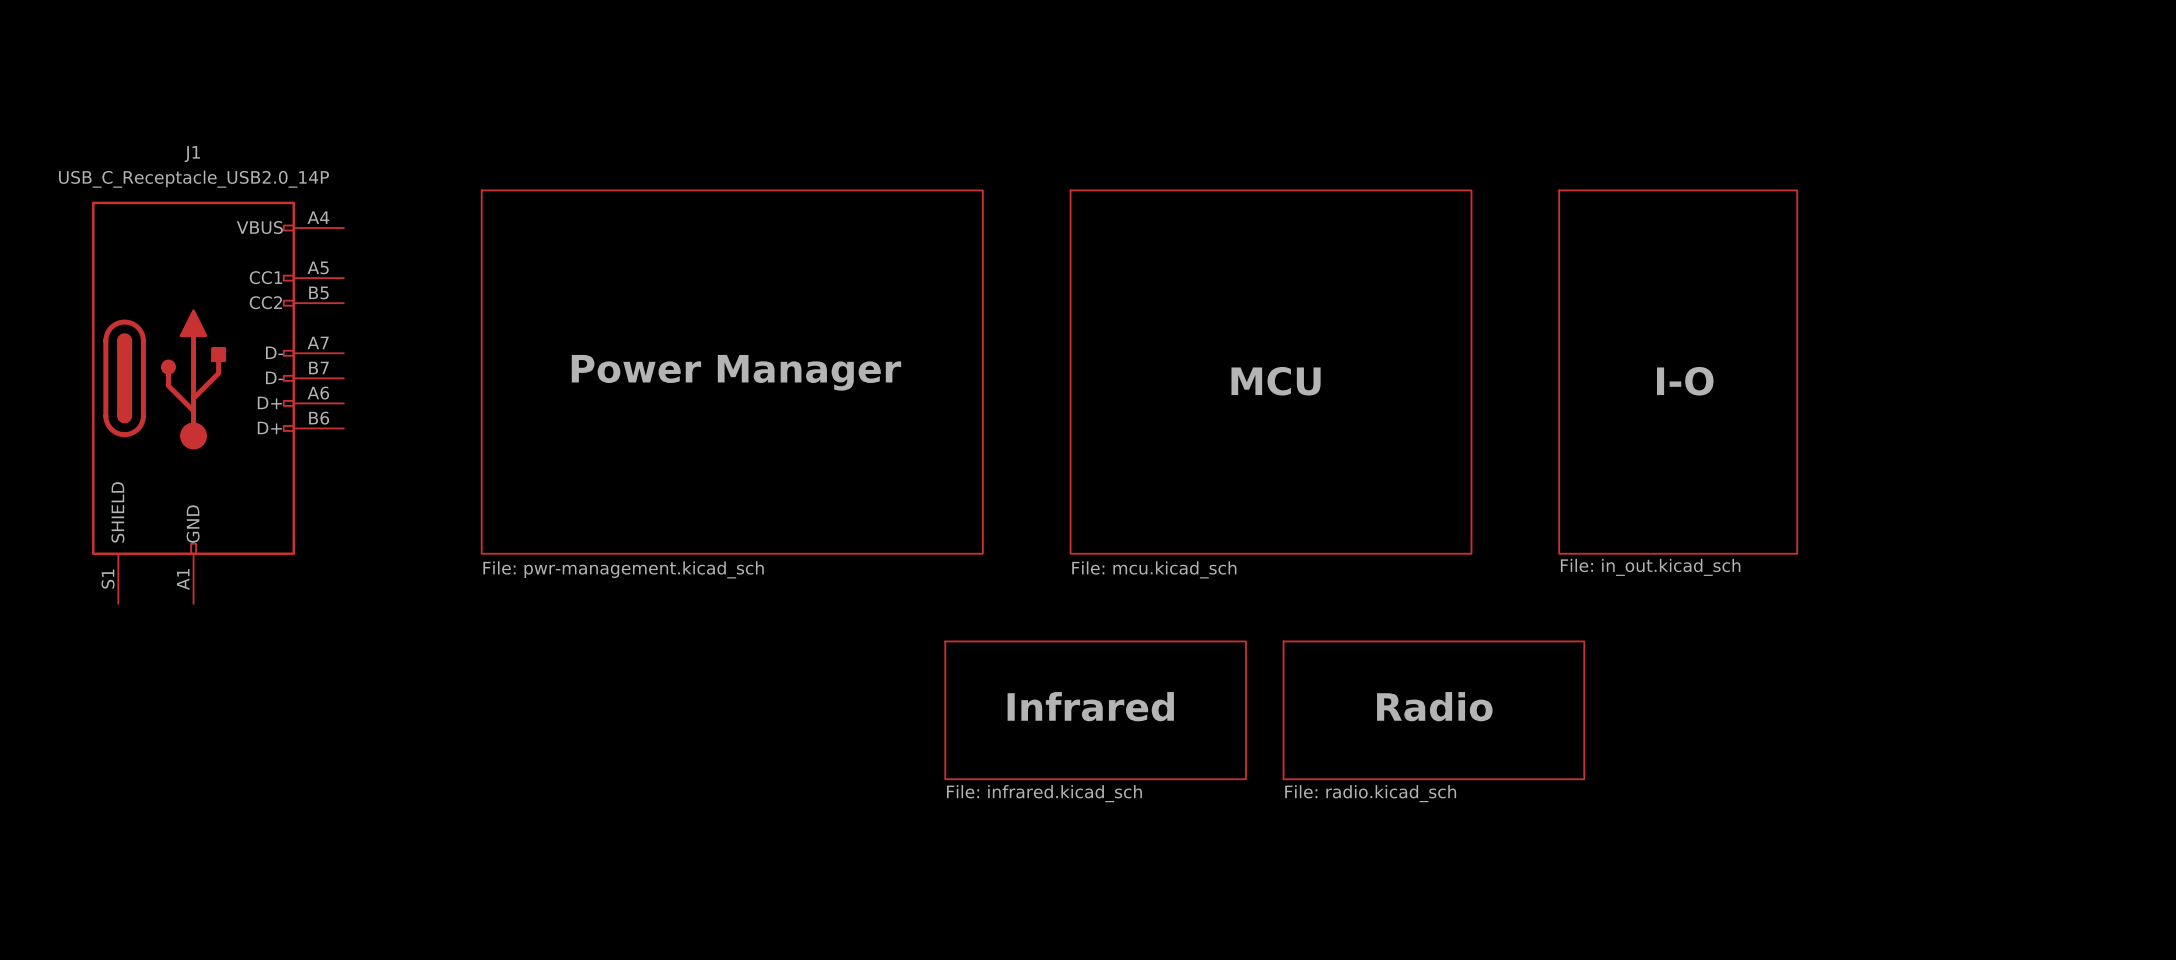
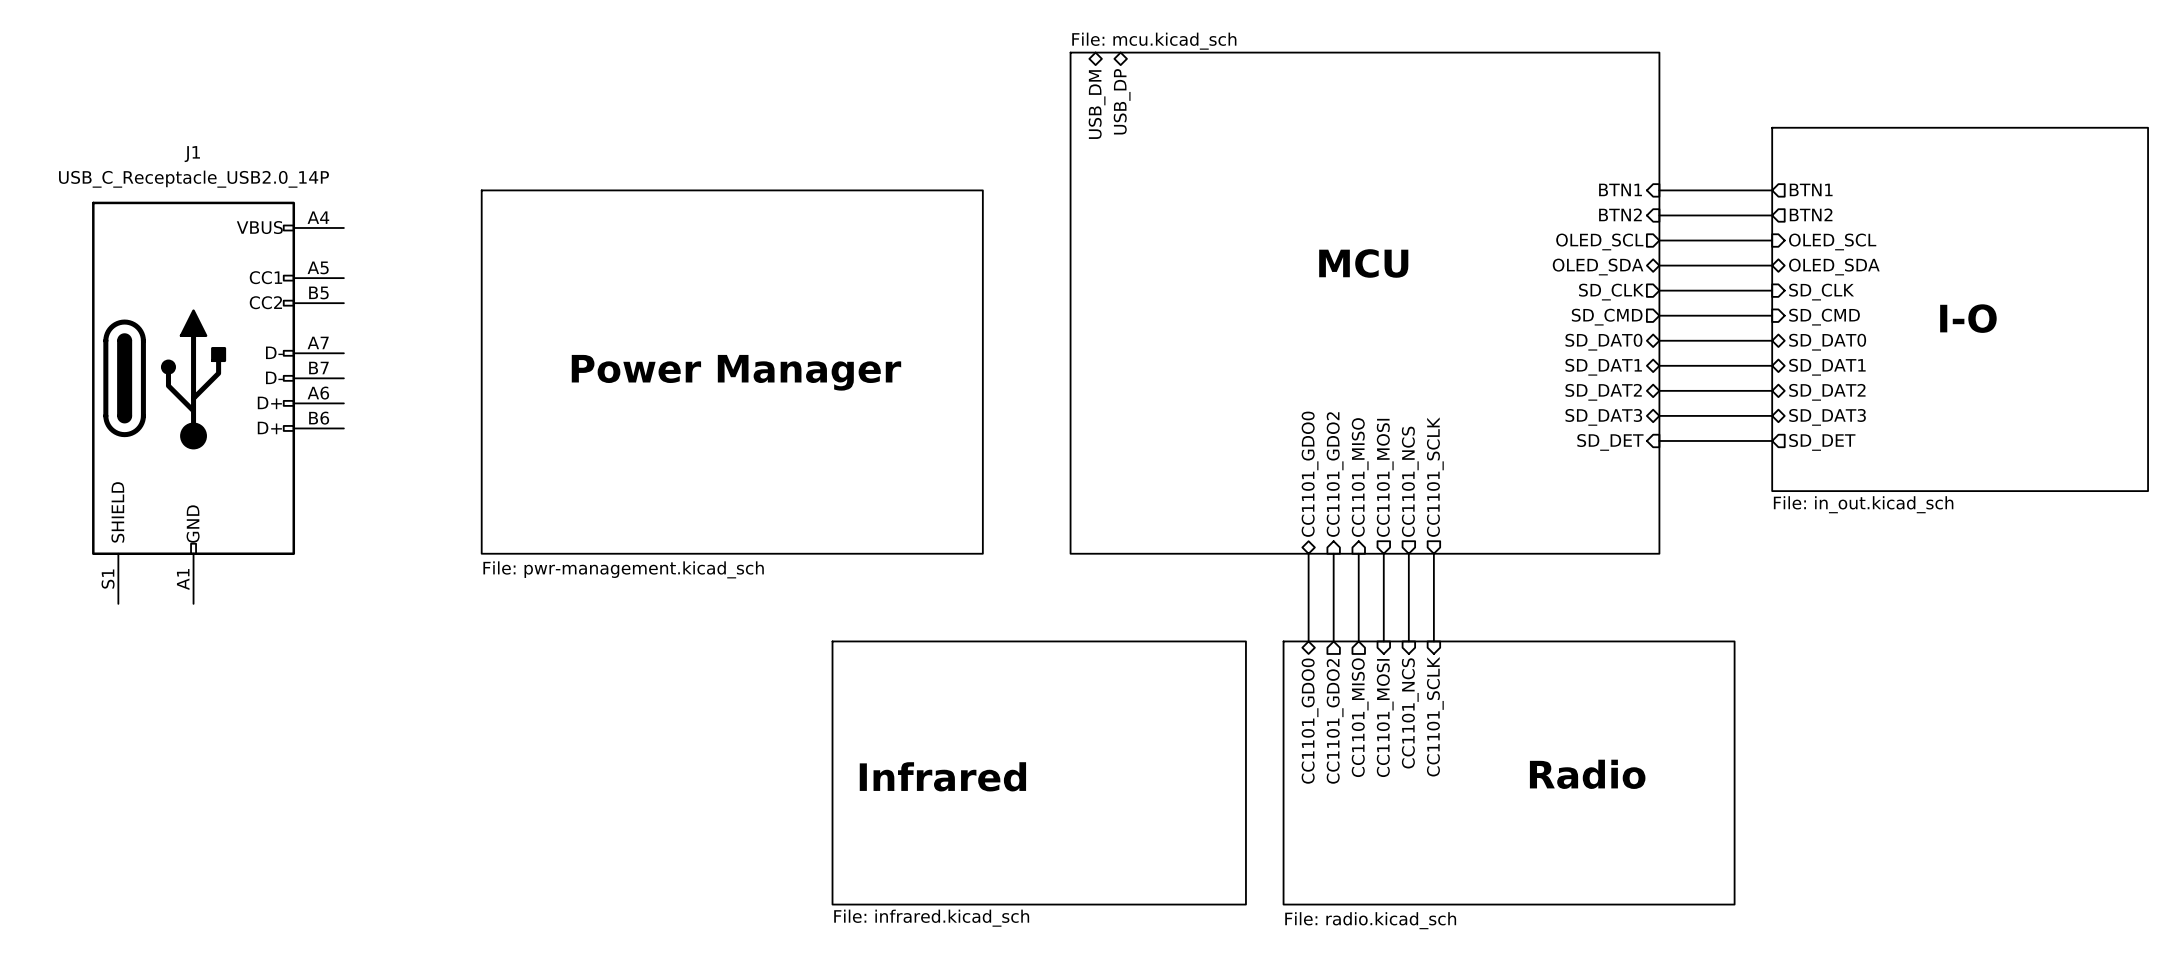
sheet pin: none -> USB_DP (1122, 101)
sheet pin: none -> USB_DM (1097, 104)
sheet pin: none -> BTN1 (1620, 189)
sheet pin: none -> BTN1 (1811, 189)
sheet pin: none -> BTN2 (1620, 214)
sheet pin: none -> BTN2 (1811, 214)
wire: none -> (1659, 215) (1772, 215)
wire: none -> (1659, 240) (1772, 240)
sheet pin: none -> OLED_SCL (1599, 241)
sheet pin: none -> OLED_SCL (1832, 241)
wire: none -> (1659, 265) (1772, 265)
sheet pin: none -> OLED_SDA (1598, 267)
sheet pin: none -> OLED_SDA (1834, 267)
wire: none -> (1659, 290) (1772, 290)
sheet pin: none -> SD_CLK (1611, 292)
sheet pin: none -> SD_CLK (1821, 292)
sheet MCU: none -> File: mcu.kicad_sch (1364, 303)
sheet I-O: none -> File: in_out.kicad_sch (1960, 309)
wire: none -> (1659, 315) (1772, 315)
sheet pin: none -> SD_CMD (1607, 317)
sheet pin: none -> SD_CMD (1824, 317)
wire: none -> (1659, 340) (1772, 340)
sheet pin: none -> SD_DAT0 (1603, 342)
sheet pin: none -> SD_DAT0 (1827, 342)
wire: none -> (1659, 365) (1772, 365)
sheet pin: none -> SD_DAT1 (1603, 367)
sheet pin: none -> SD_DAT1 (1827, 367)
sheet MCU: File: mcu.kicad_sch (1271, 372) -> none
sheet I-O: File: in_out.kicad_sch (1678, 372) -> none
wire: none -> (1659, 390) (1772, 390)
sheet pin: none -> SD_DAT2 (1603, 392)
sheet pin: none -> SD_DAT2 (1827, 392)
wire: none -> (1659, 415) (1772, 415)
sheet pin: none -> SD_DAT3 (1603, 417)
sheet pin: none -> SD_DAT3 (1827, 417)
wire: none -> (1659, 440) (1772, 440)
sheet pin: none -> SD_DET (1610, 442)
sheet pin: none -> SD_DET (1822, 442)
sheet pin: none -> CC1101_GDO0 (1310, 474)
sheet pin: none -> CC1101_GDO2 (1335, 474)
sheet pin: none -> CC1101_MISO (1360, 477)
sheet pin: none -> CC1101_MOSI (1385, 477)
sheet pin: none -> CC1101_SCLK (1435, 477)
sheet pin: none -> CC1101_NCS (1410, 481)
wire: none -> (1308, 553) (1308, 641)
wire: none -> (1333, 553) (1333, 641)
wire: none -> (1358, 553) (1358, 641)
wire: none -> (1383, 553) (1383, 641)
wire: none -> (1408, 553) (1408, 641)
wire: none -> (1433, 553) (1433, 641)
sheet Infrared: File: infrared.kicad_sch (1095, 710) -> none
sheet Radio: File: radio.kicad_sch (1433, 710) -> none
sheet pin: none -> CC1101_NCS (1410, 713)
sheet pin: none -> CC1101_SCLK (1435, 716)
sheet pin: none -> CC1101_MISO (1360, 717)
sheet pin: none -> CC1101_MOSI (1385, 718)
sheet pin: none -> CC1101_GDO0 (1310, 721)
sheet pin: none -> CC1101_GDO2 (1335, 721)
sheet Infrared: none -> File: infrared.kicad_sch (1039, 773)
sheet Radio: none -> File: radio.kicad_sch (1509, 773)

